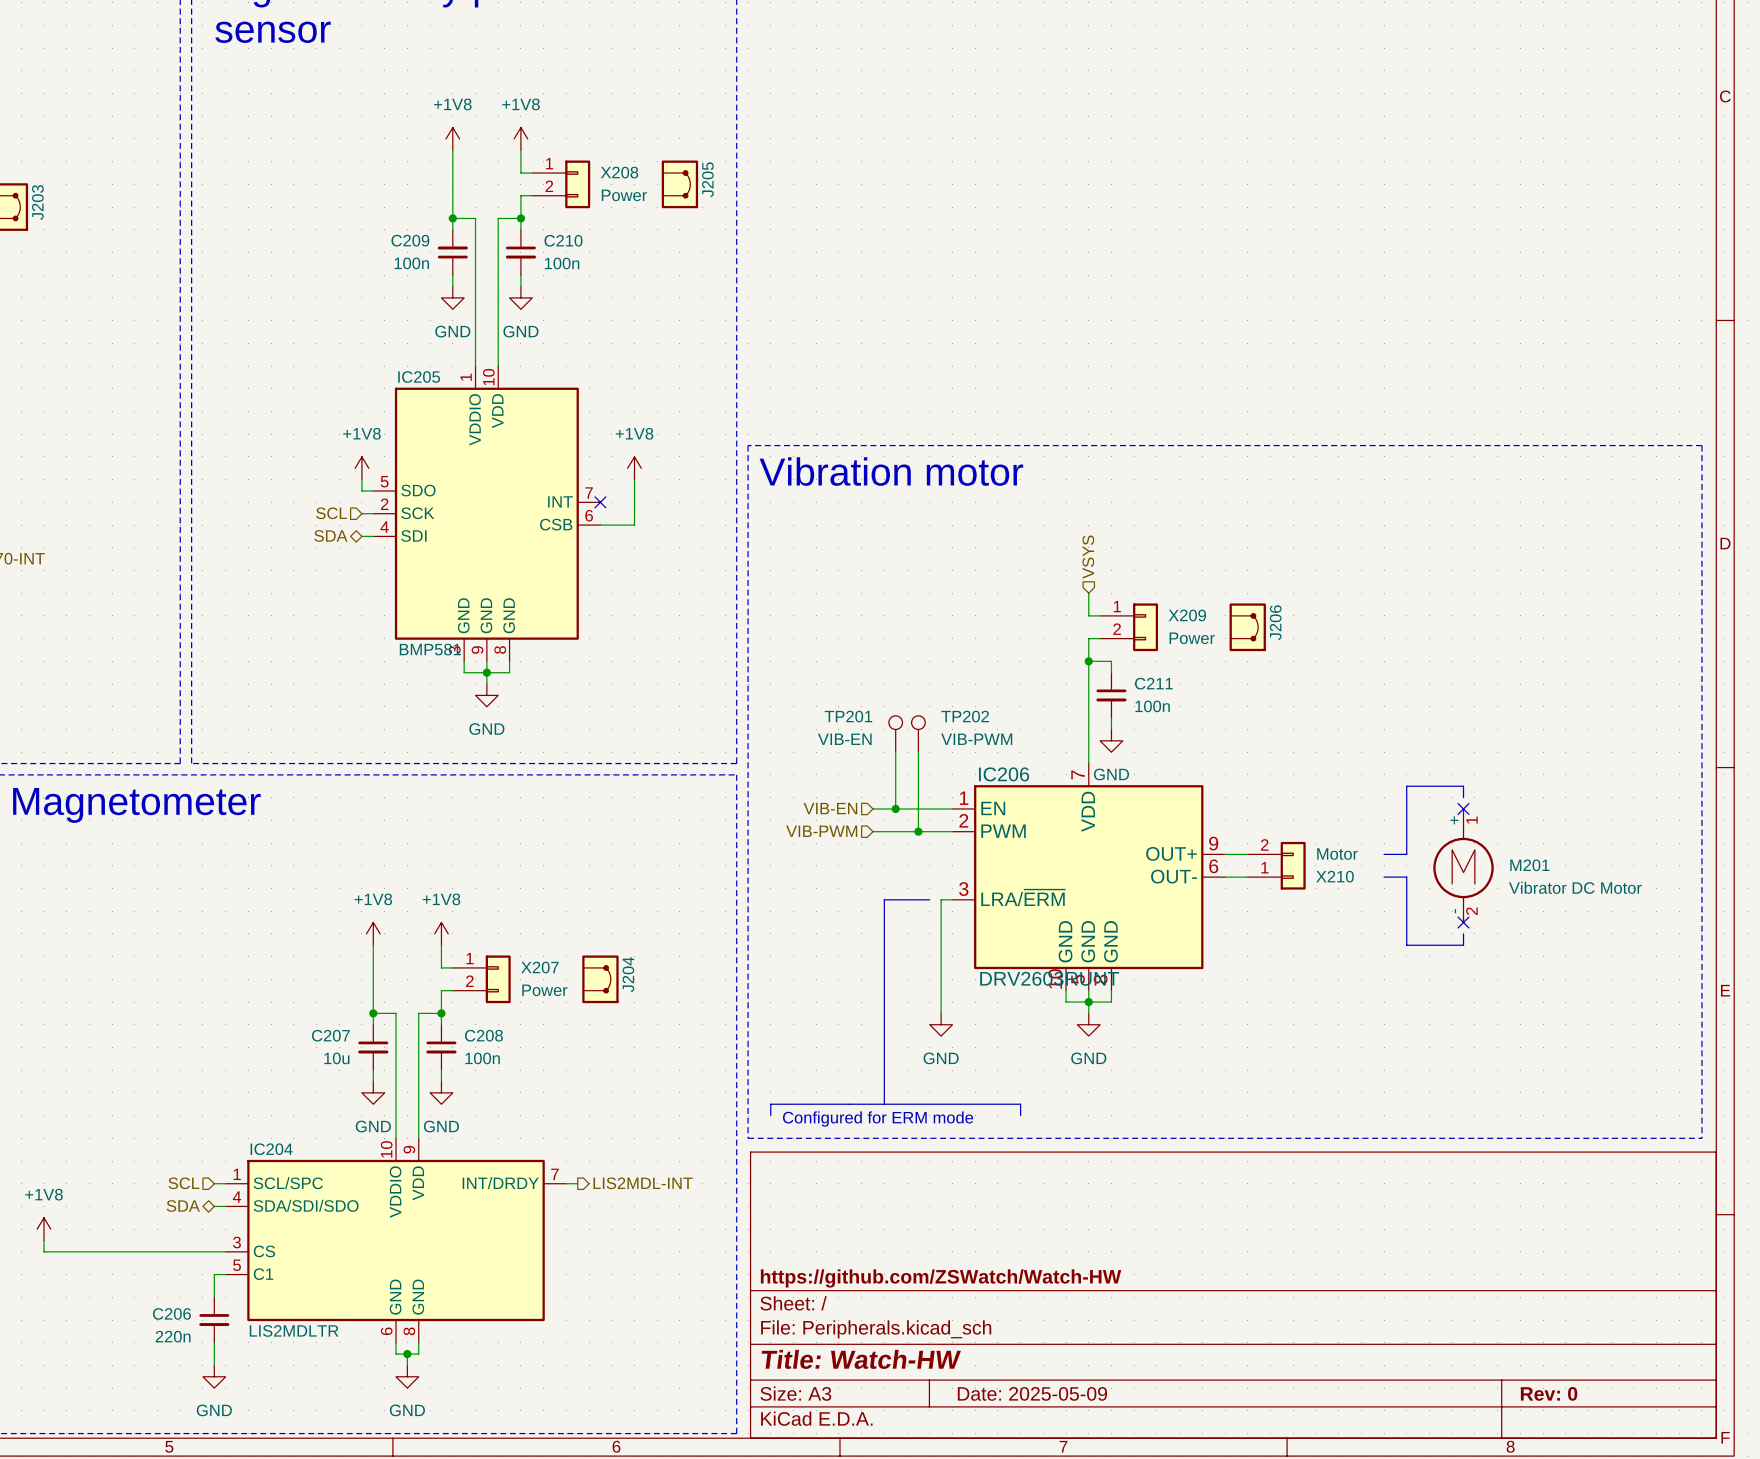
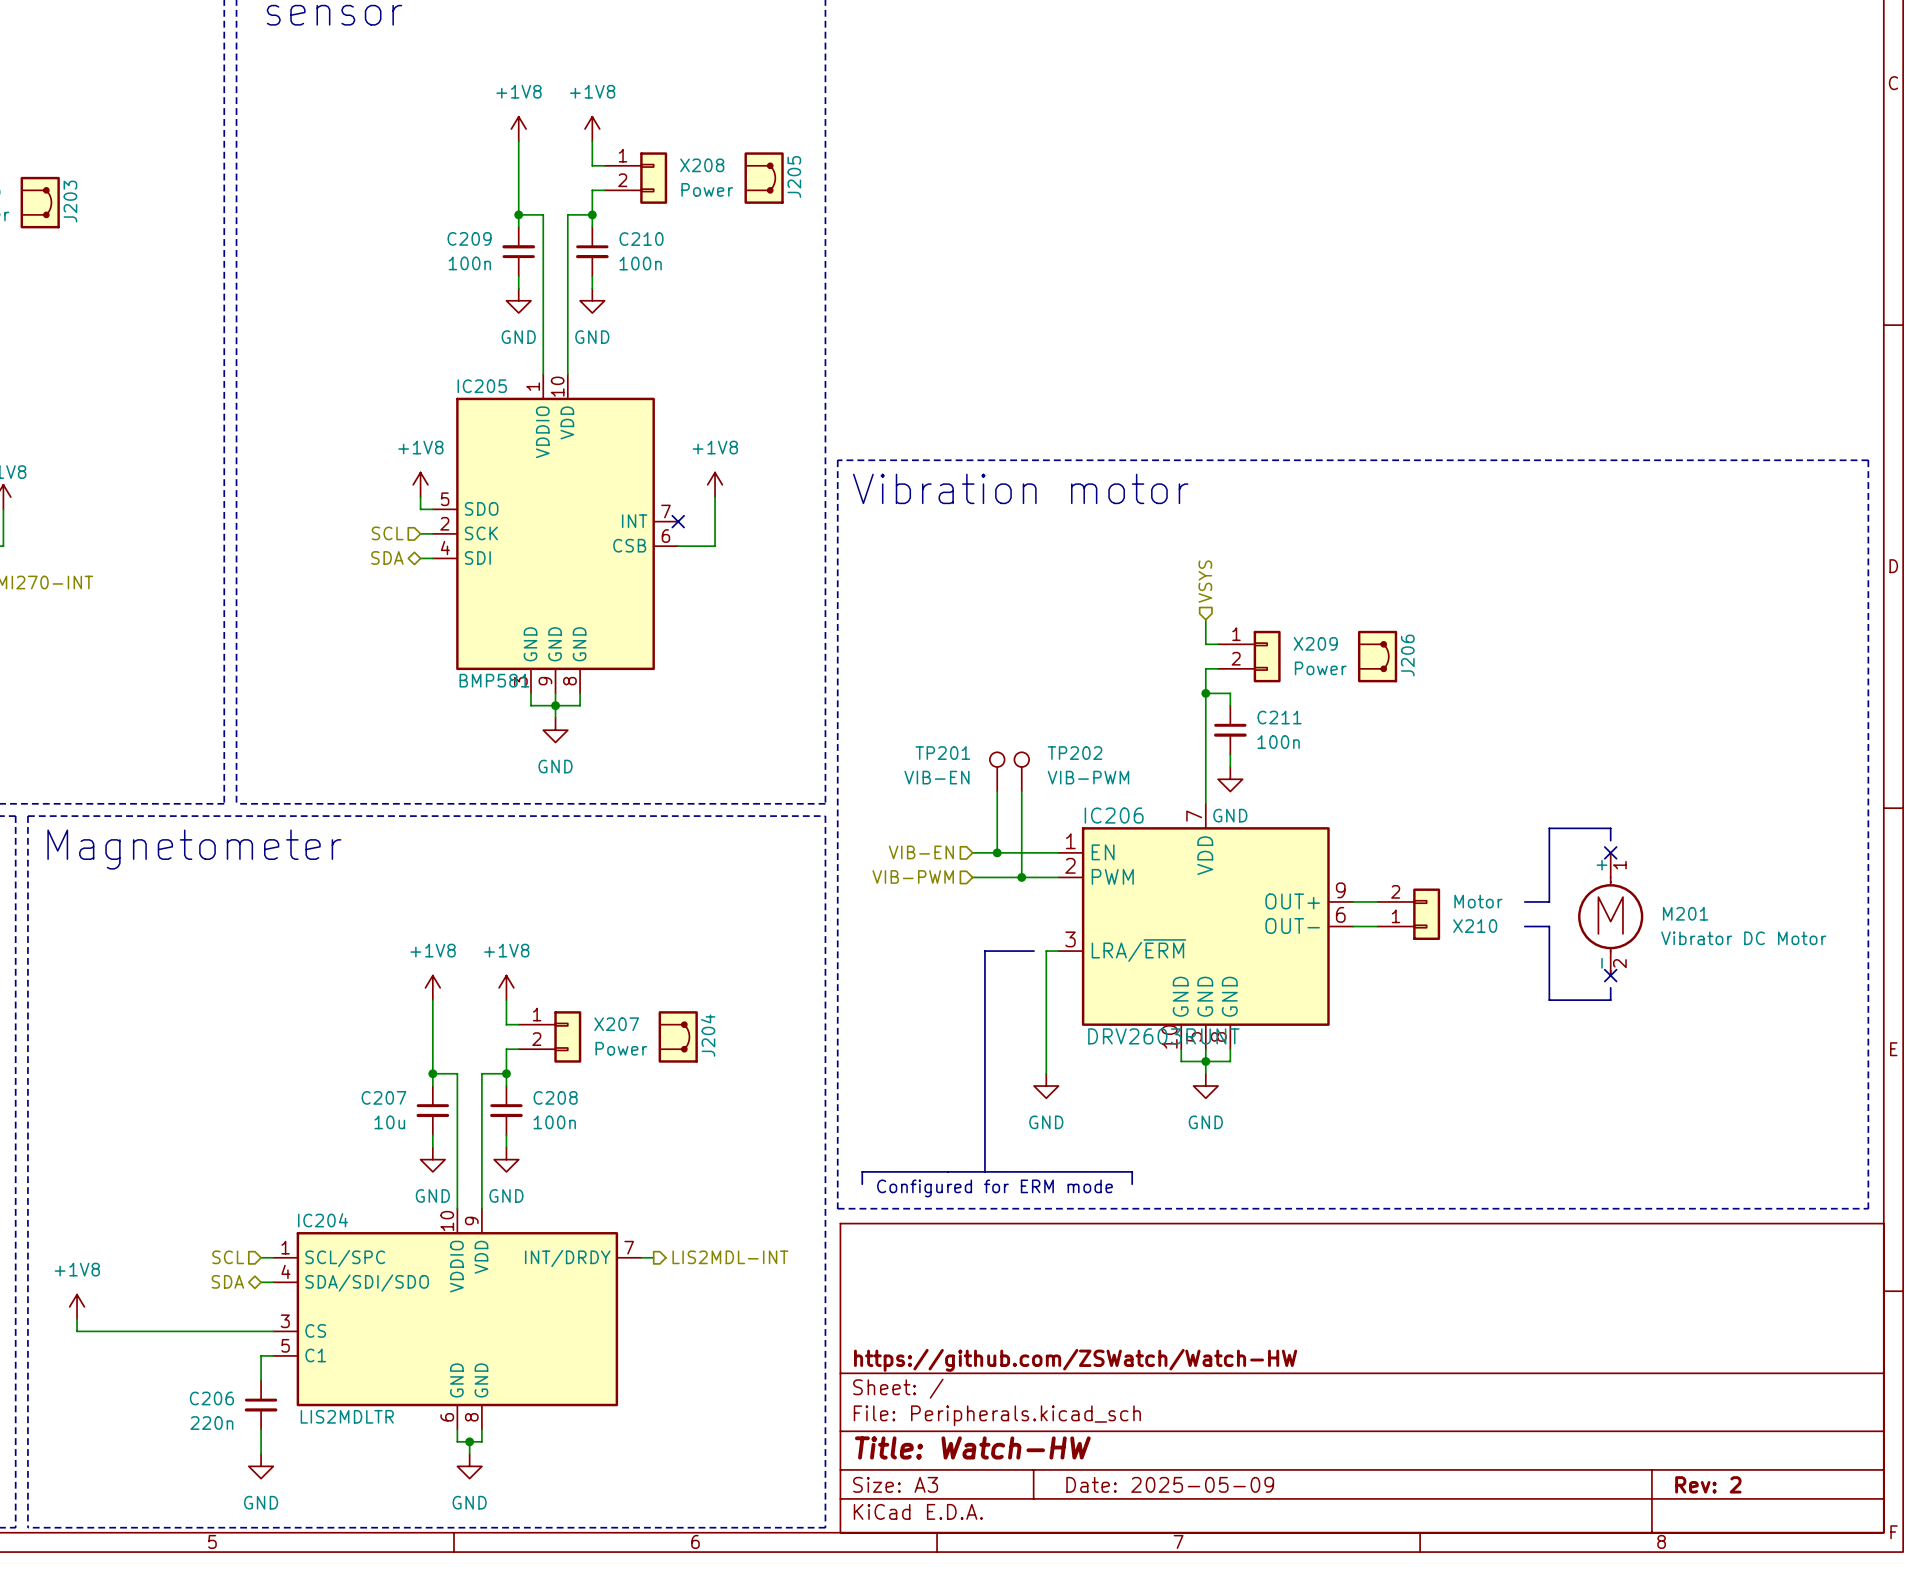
title block: Rev: 0 (1549, 1393) -> Rev: 2 (1708, 1484)

